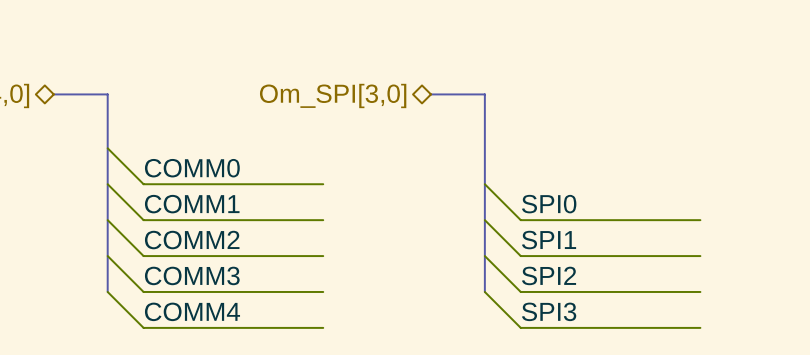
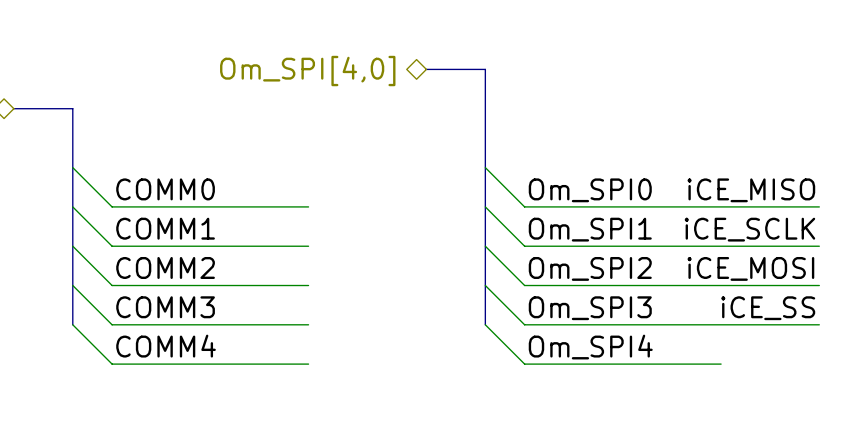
bus: (430, 94) (484, 94) -> (426, 69) (485, 69) (485, 108)
hierarchical label: Om_SPI[3,0] (333, 95) -> Om_SPI[4,0] (307, 71)
wire: none -> (485, 167) (524, 206) (819, 206)
label: none -> Om_SPI0 (590, 190)
label: none -> iCE_MISO (751, 190)
label: SPI0 (549, 204) -> Om_SPI1 (590, 229)
label: none -> iCE_SCLK (749, 229)
wire: none -> (721, 246) (819, 246)
label: SPI1 (549, 240) -> Om_SPI2 (590, 268)
label: none -> iCE_MOSI (750, 268)
wire: none -> (721, 285) (819, 285)
label: SPI2 (549, 275) -> Om_SPI3 (590, 308)
label: none -> iCE_SS (768, 308)
wire: none -> (721, 324) (819, 324)
label: SPI3 (549, 311) -> Om_SPI4 (590, 347)

